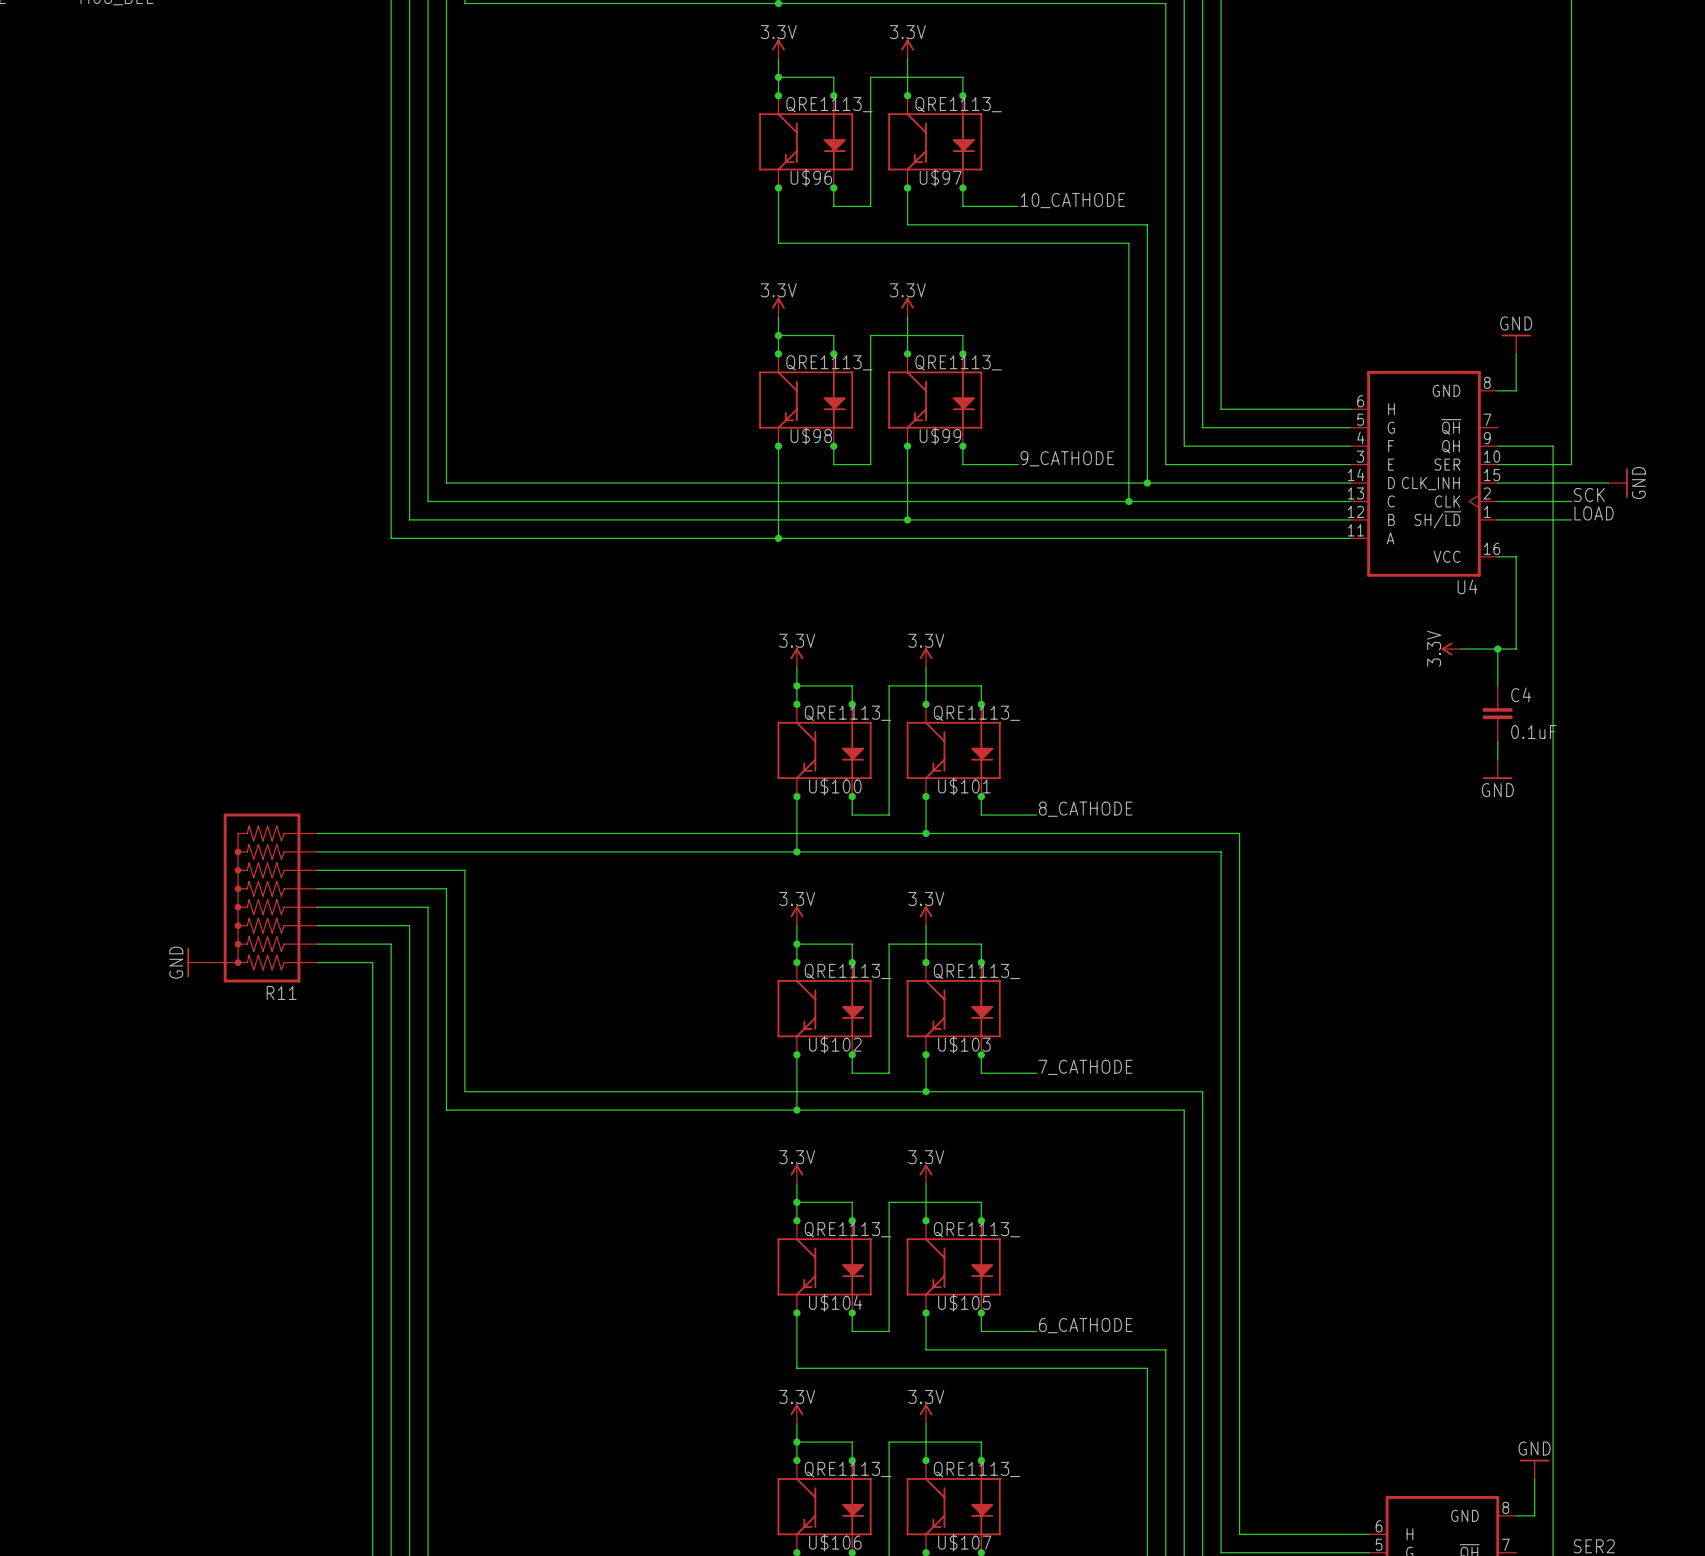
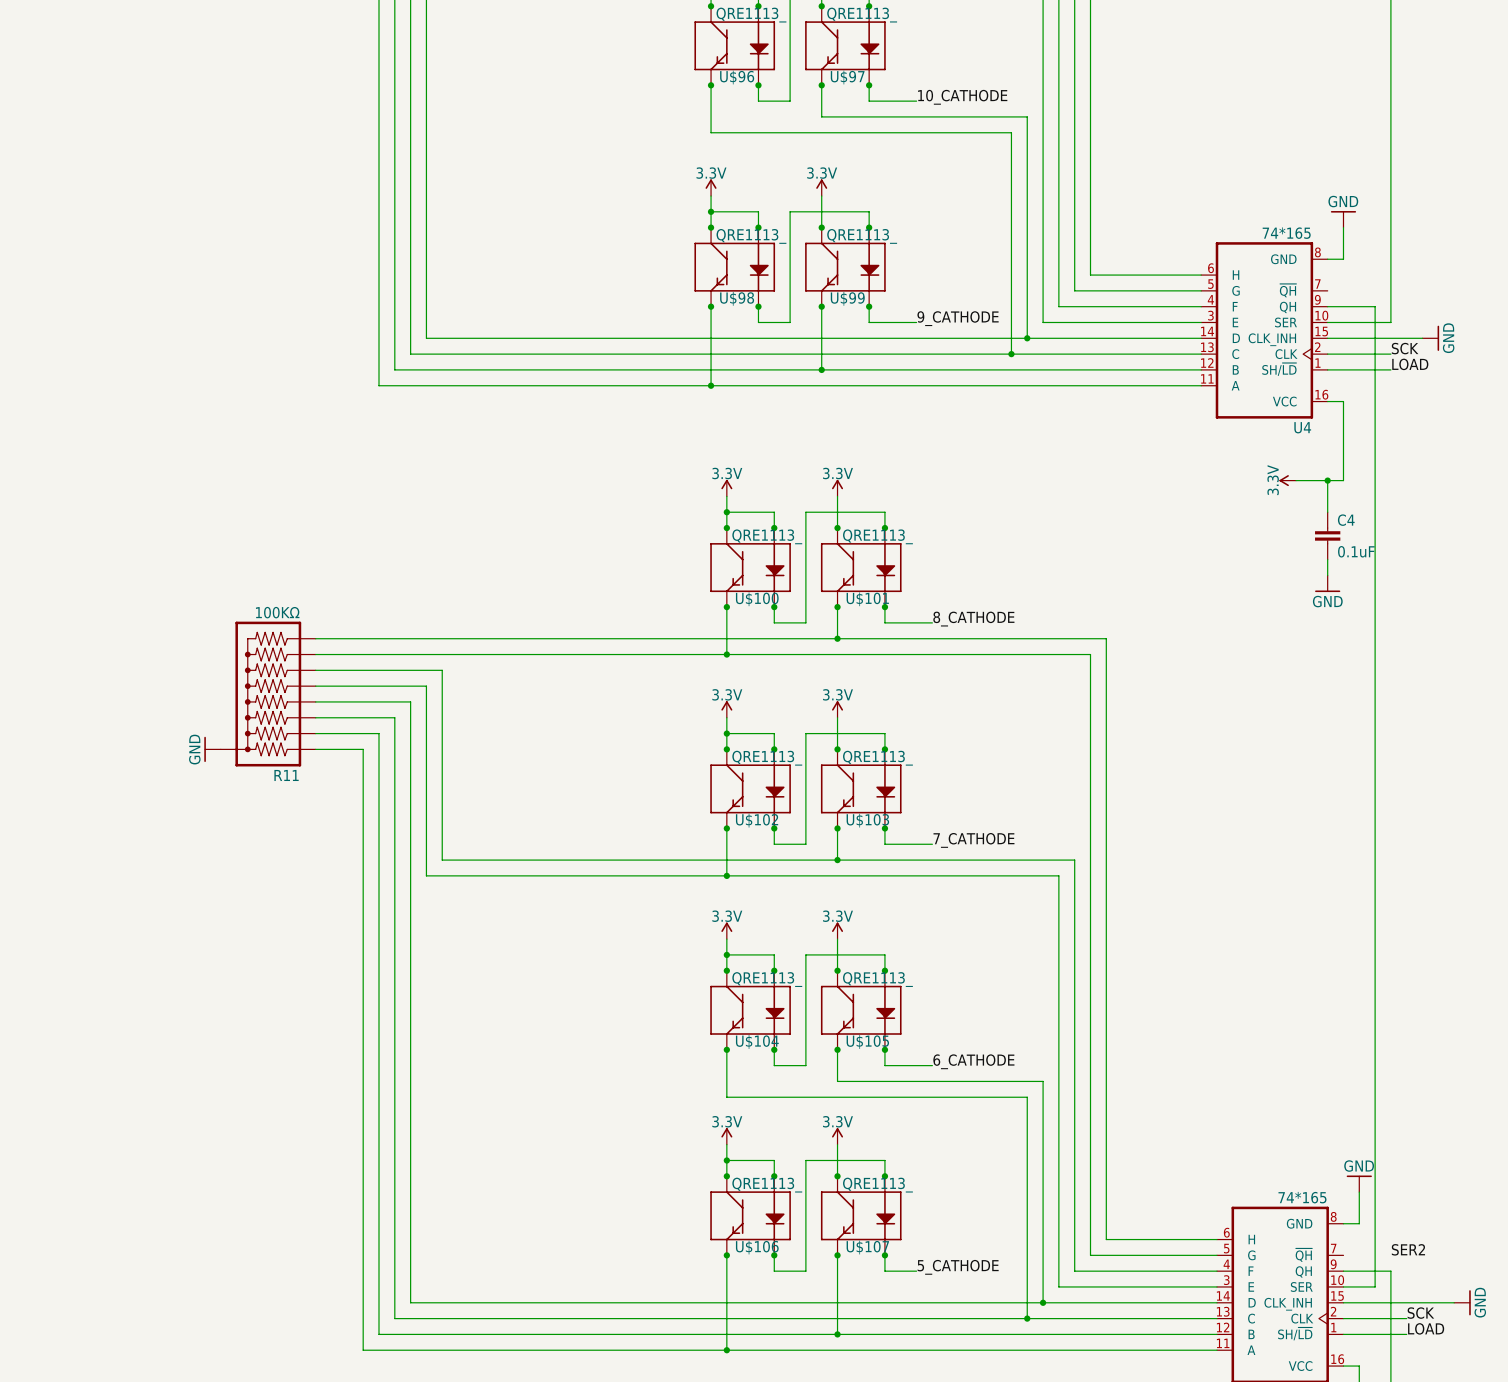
U4 value: none -> 74*165 (1286, 233)
R11 value: none -> 100KΩ (277, 612)
part value: none -> 74*165 (1302, 1197)

